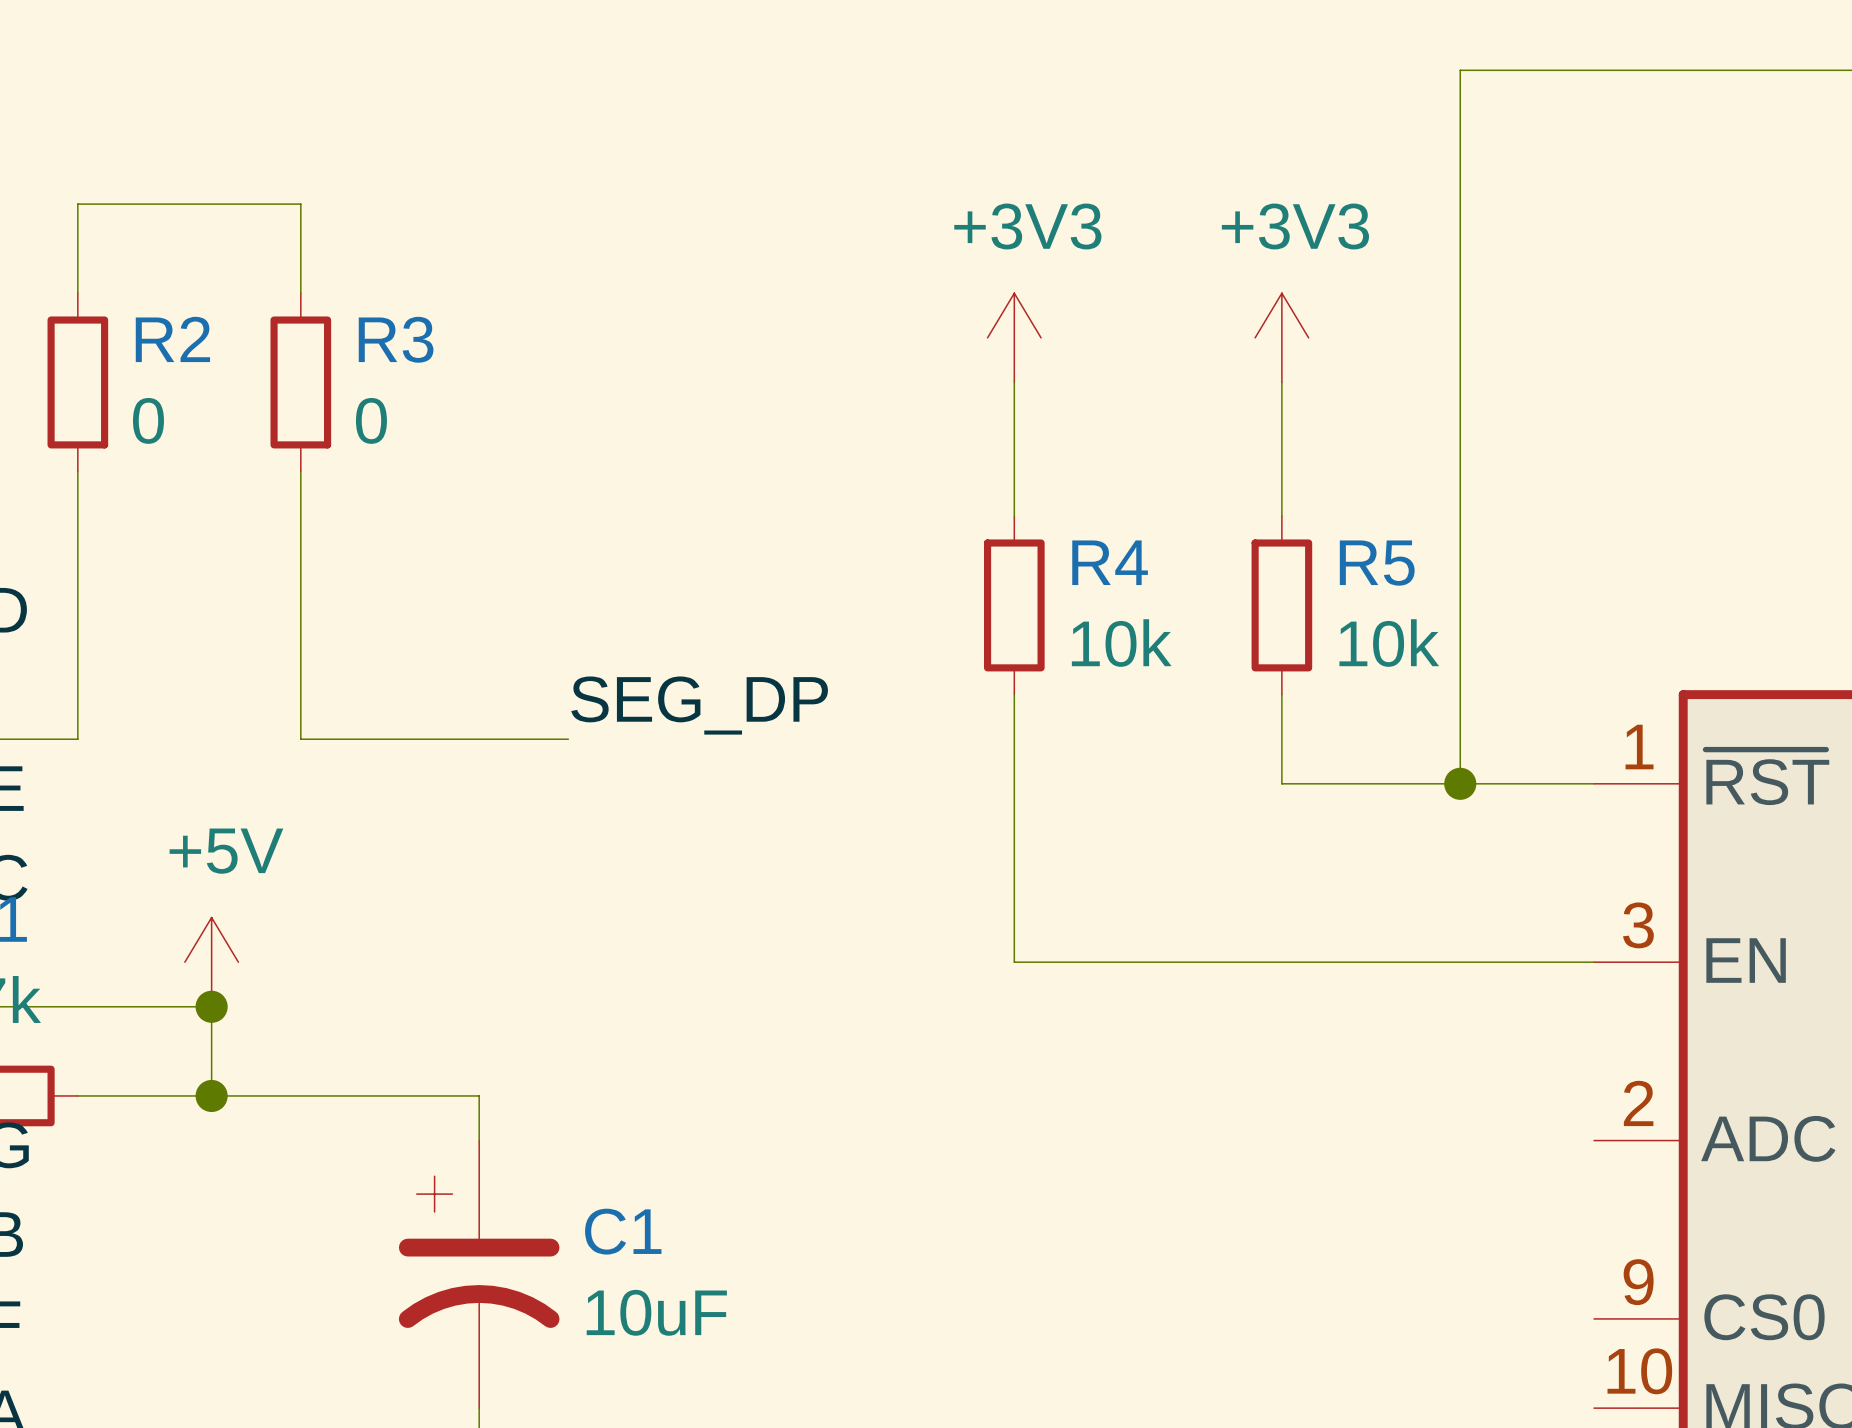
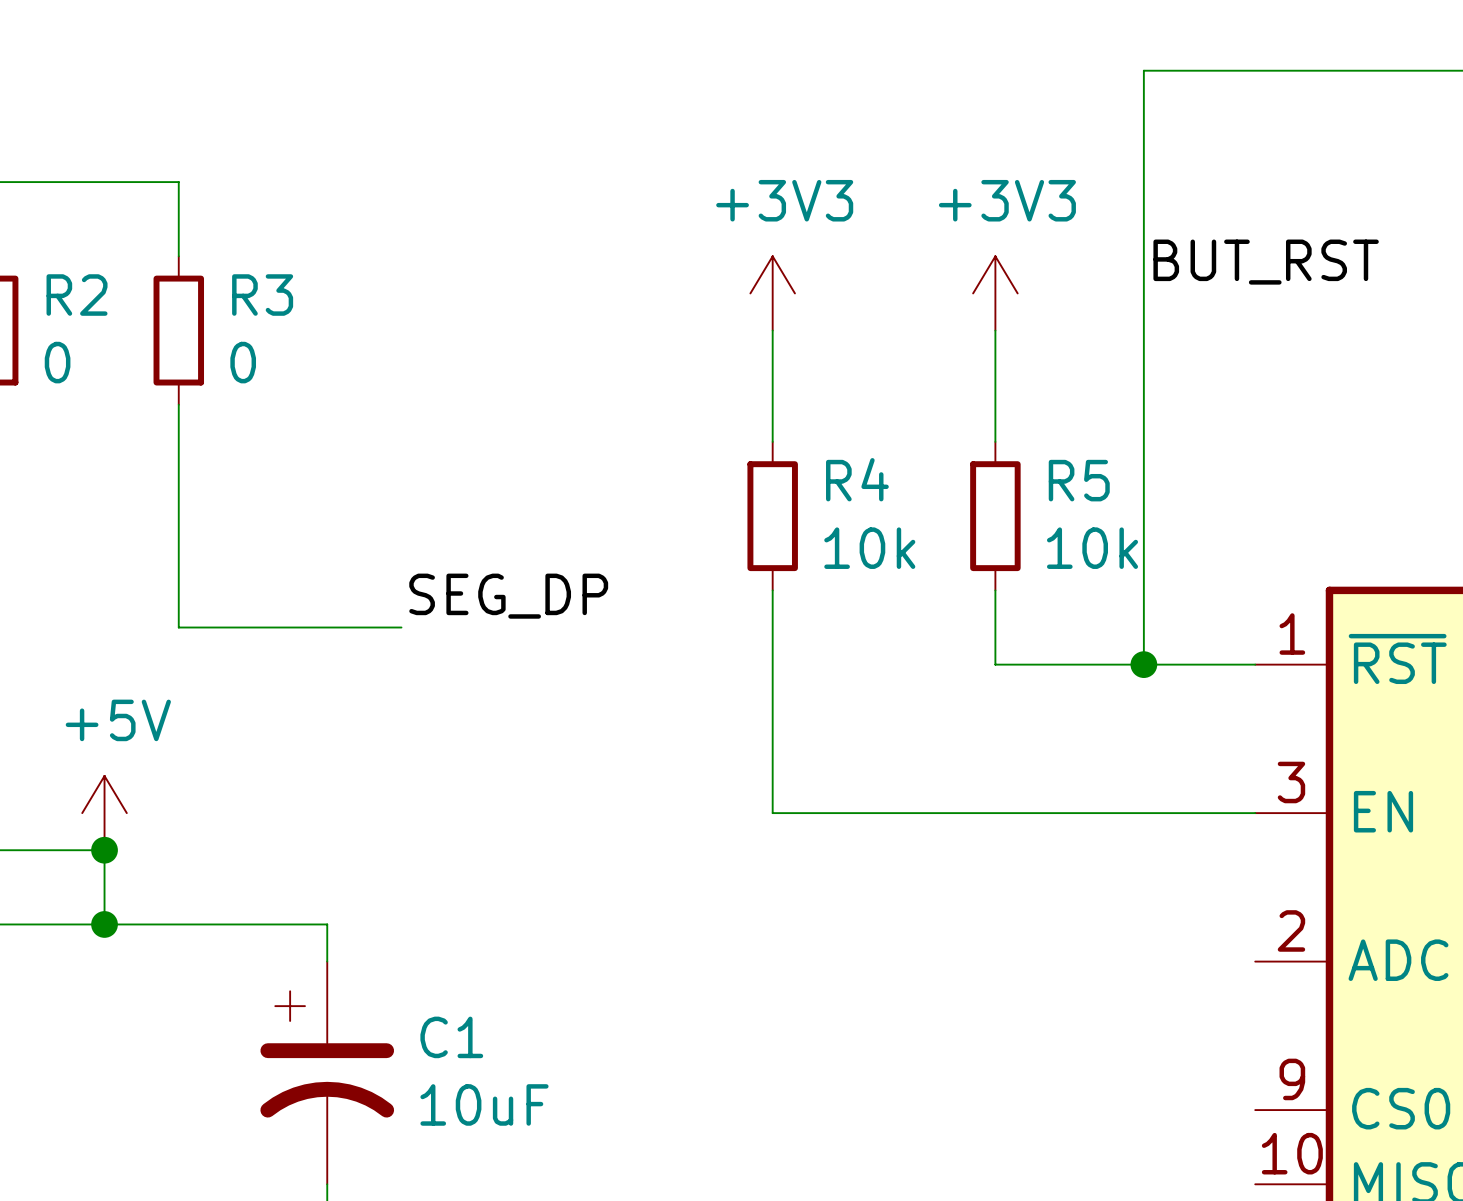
label: none -> BUT_RST (1266, 262)

